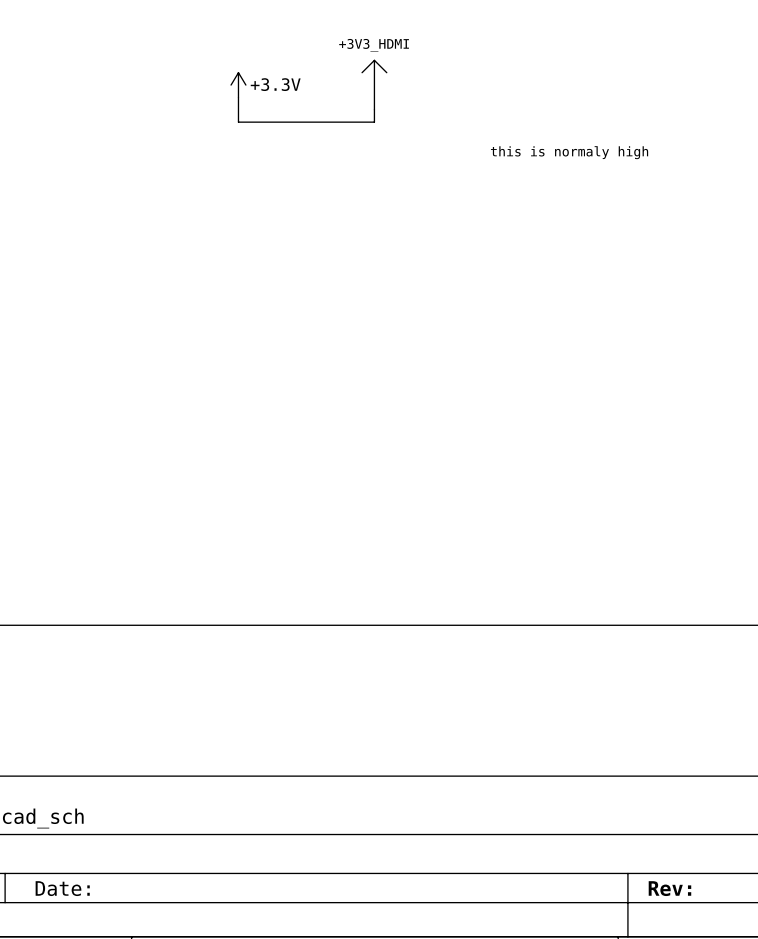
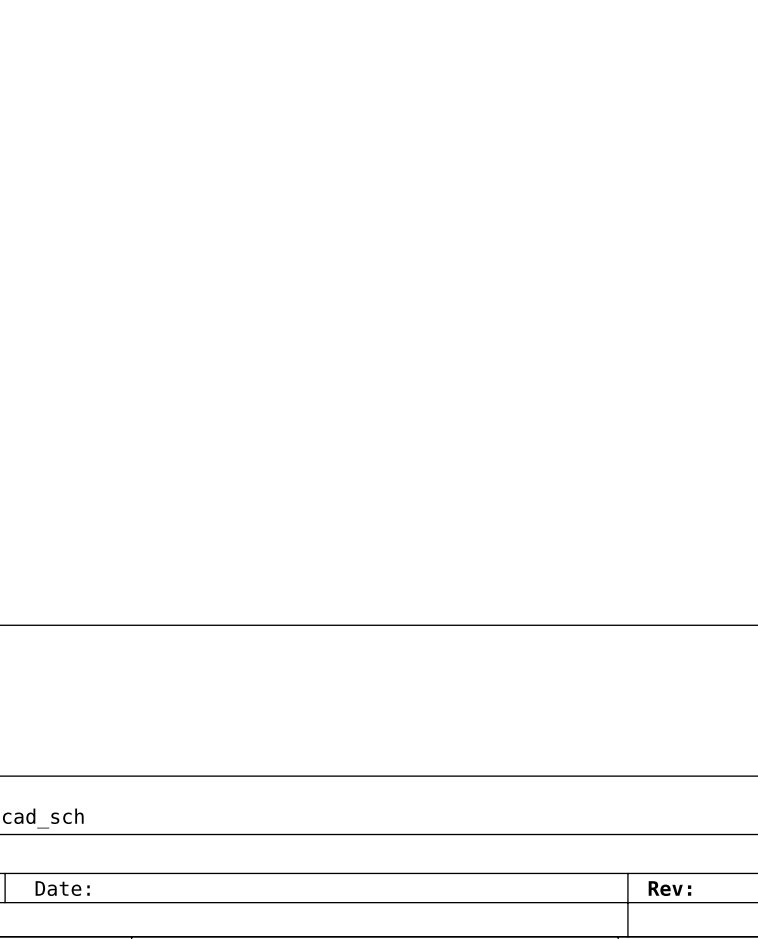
power symbol: +3.3V (238, 85) -> none
power symbol: +3V3_HDMI (374, 85) -> none
wire: (238, 97) (238, 122) (374, 122) (374, 109) -> none
text: this is normaly high (569, 152) -> none

